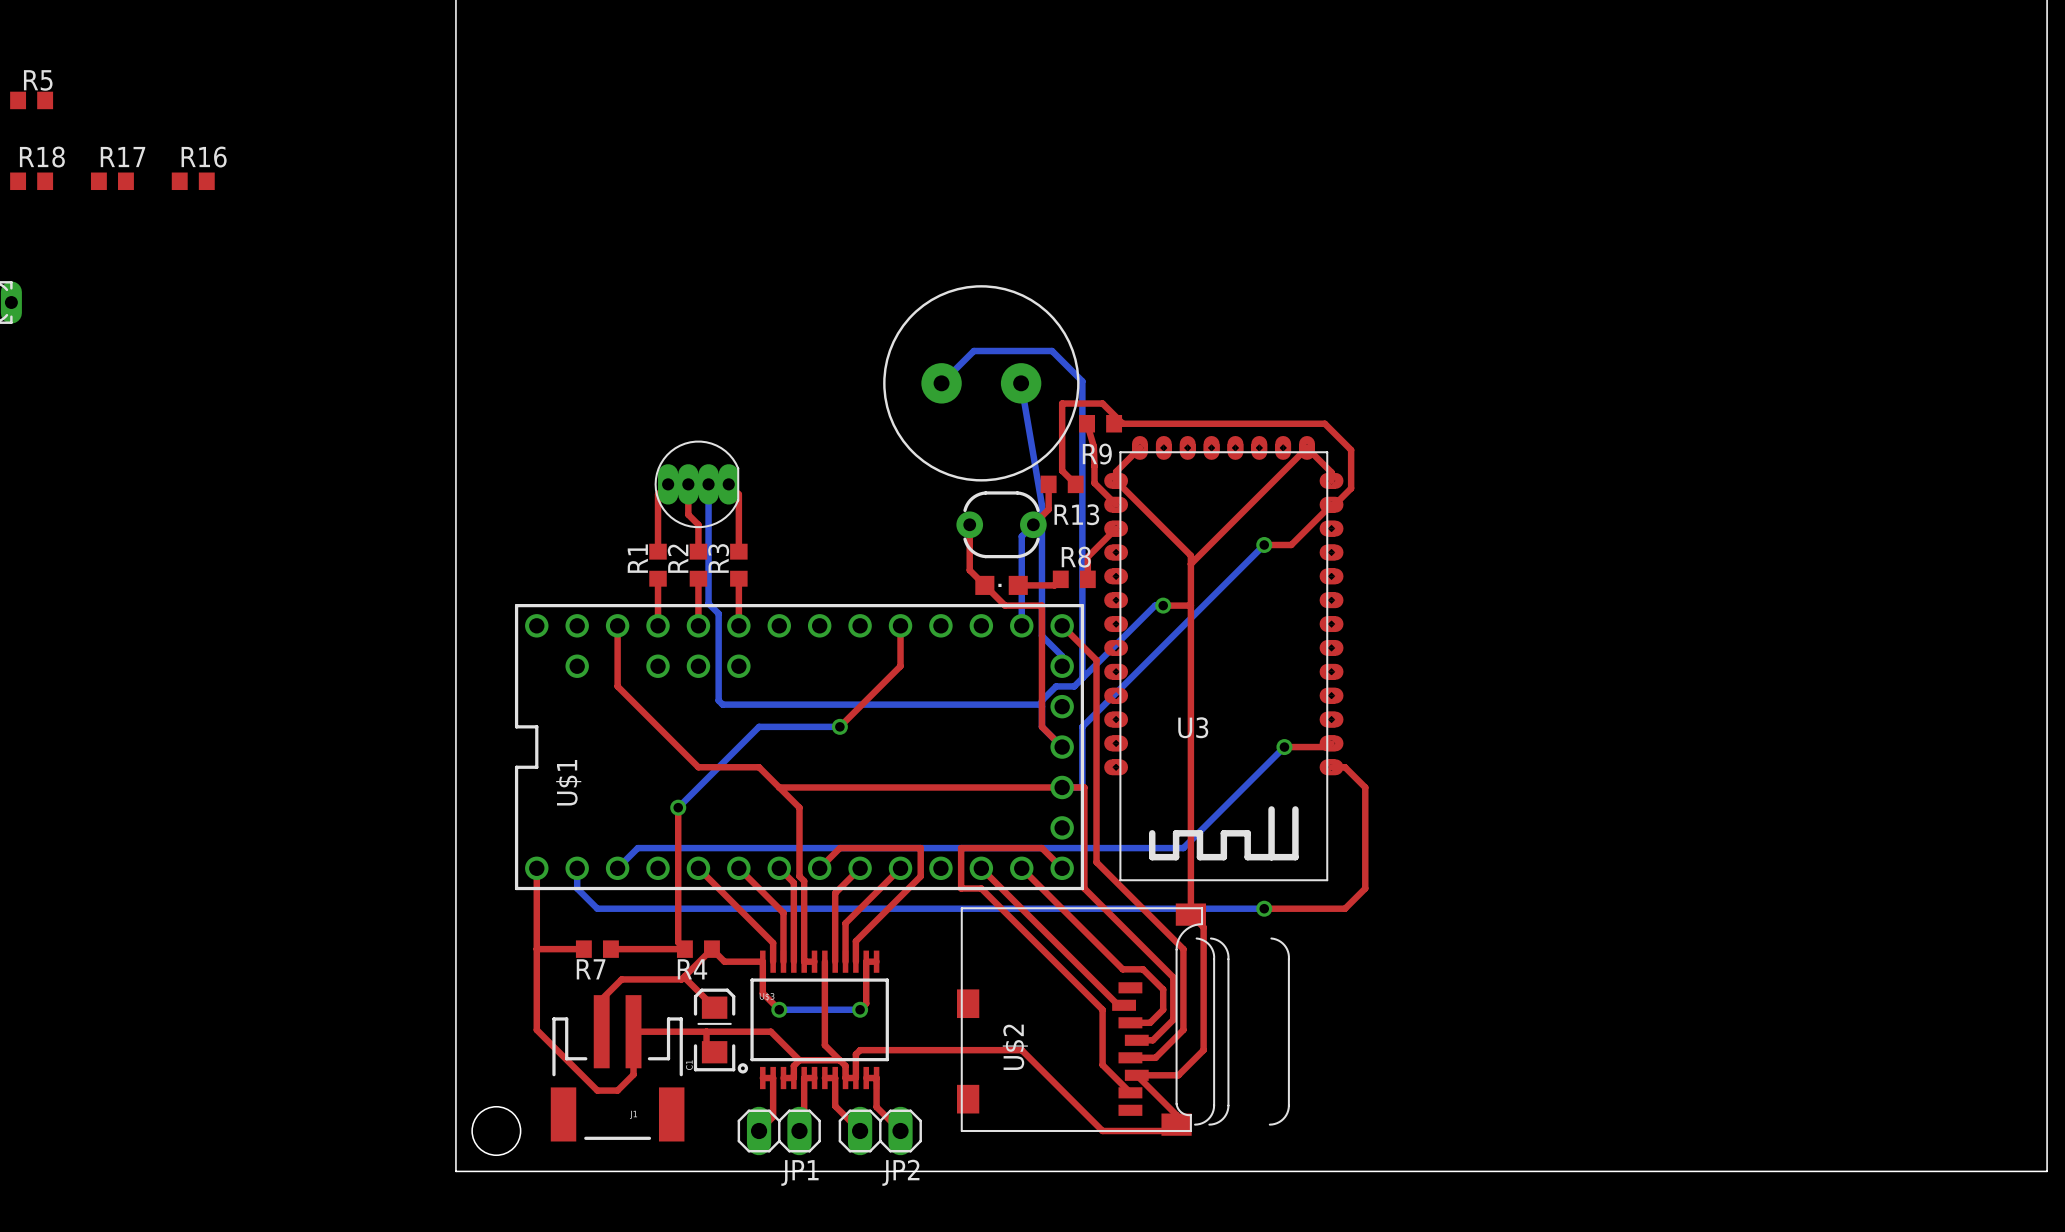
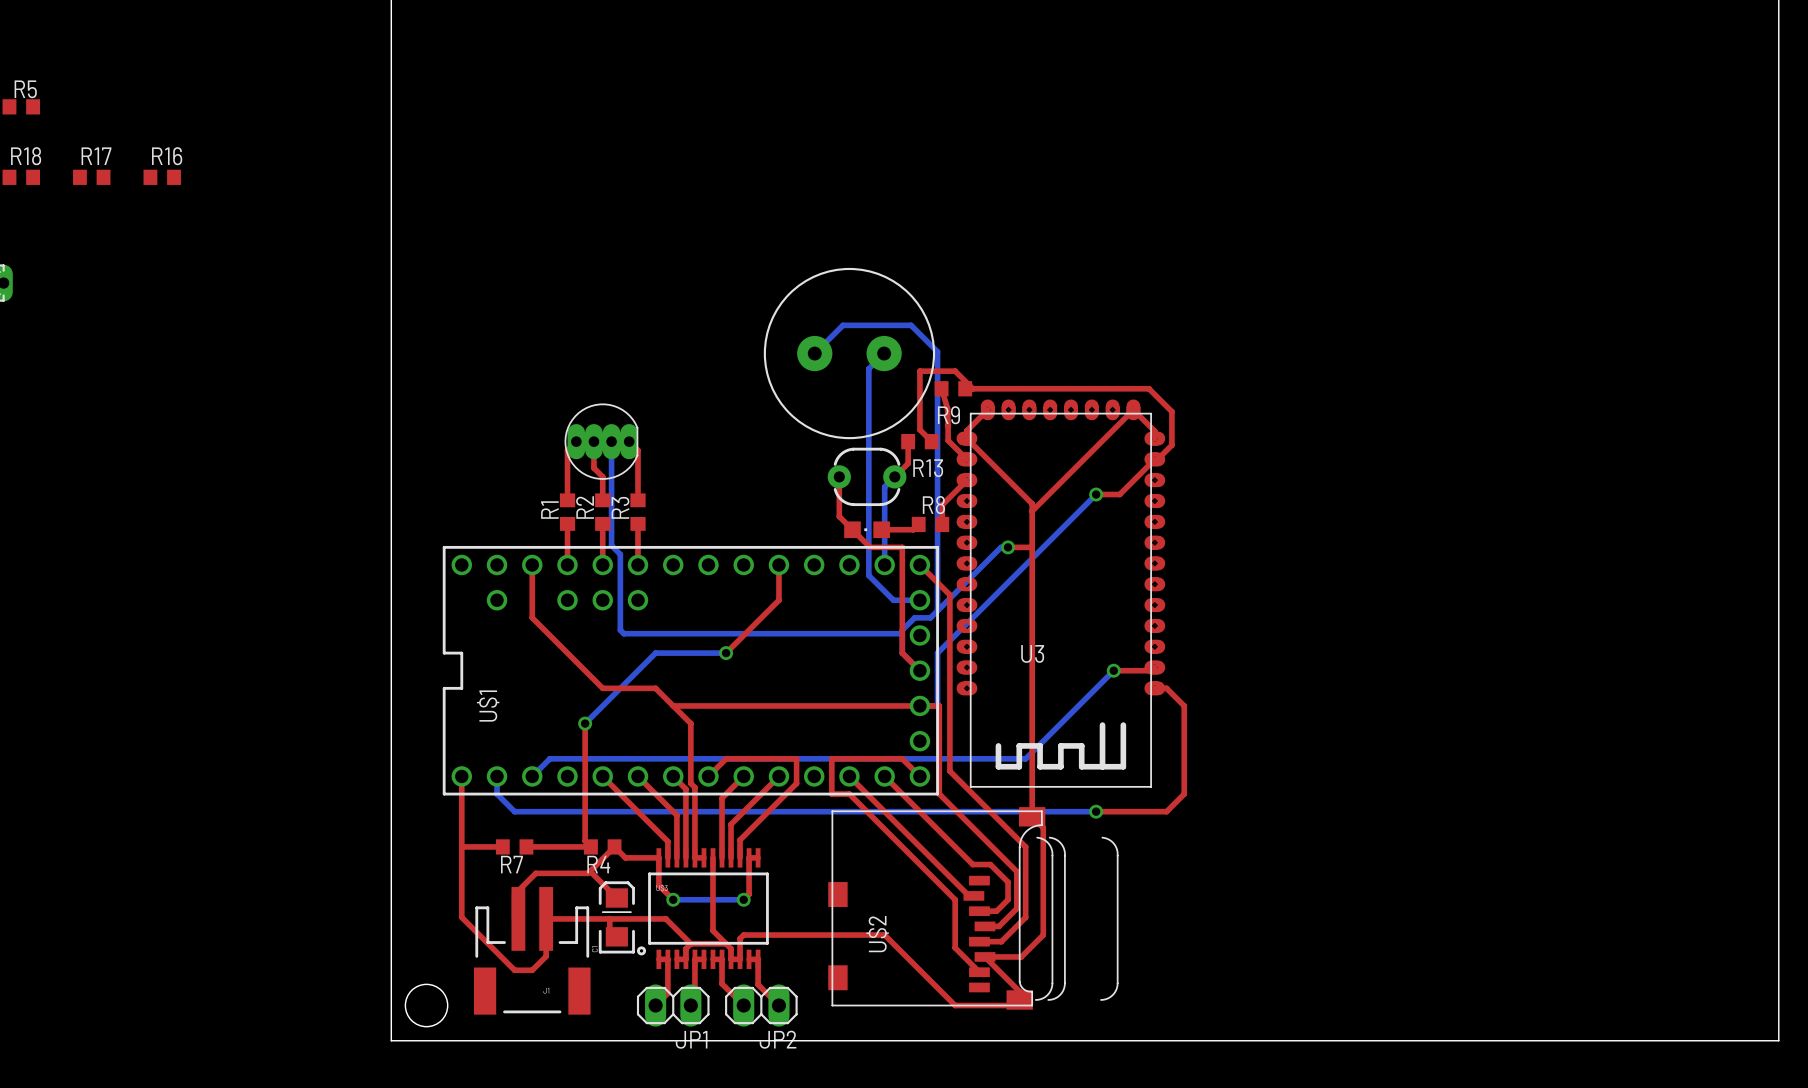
bottom track: (1021, 383) (1041, 505) (1041, 635) (1062, 656) (1062, 666) -> (884, 353) (868, 368) (868, 575) (893, 600) (919, 600)

